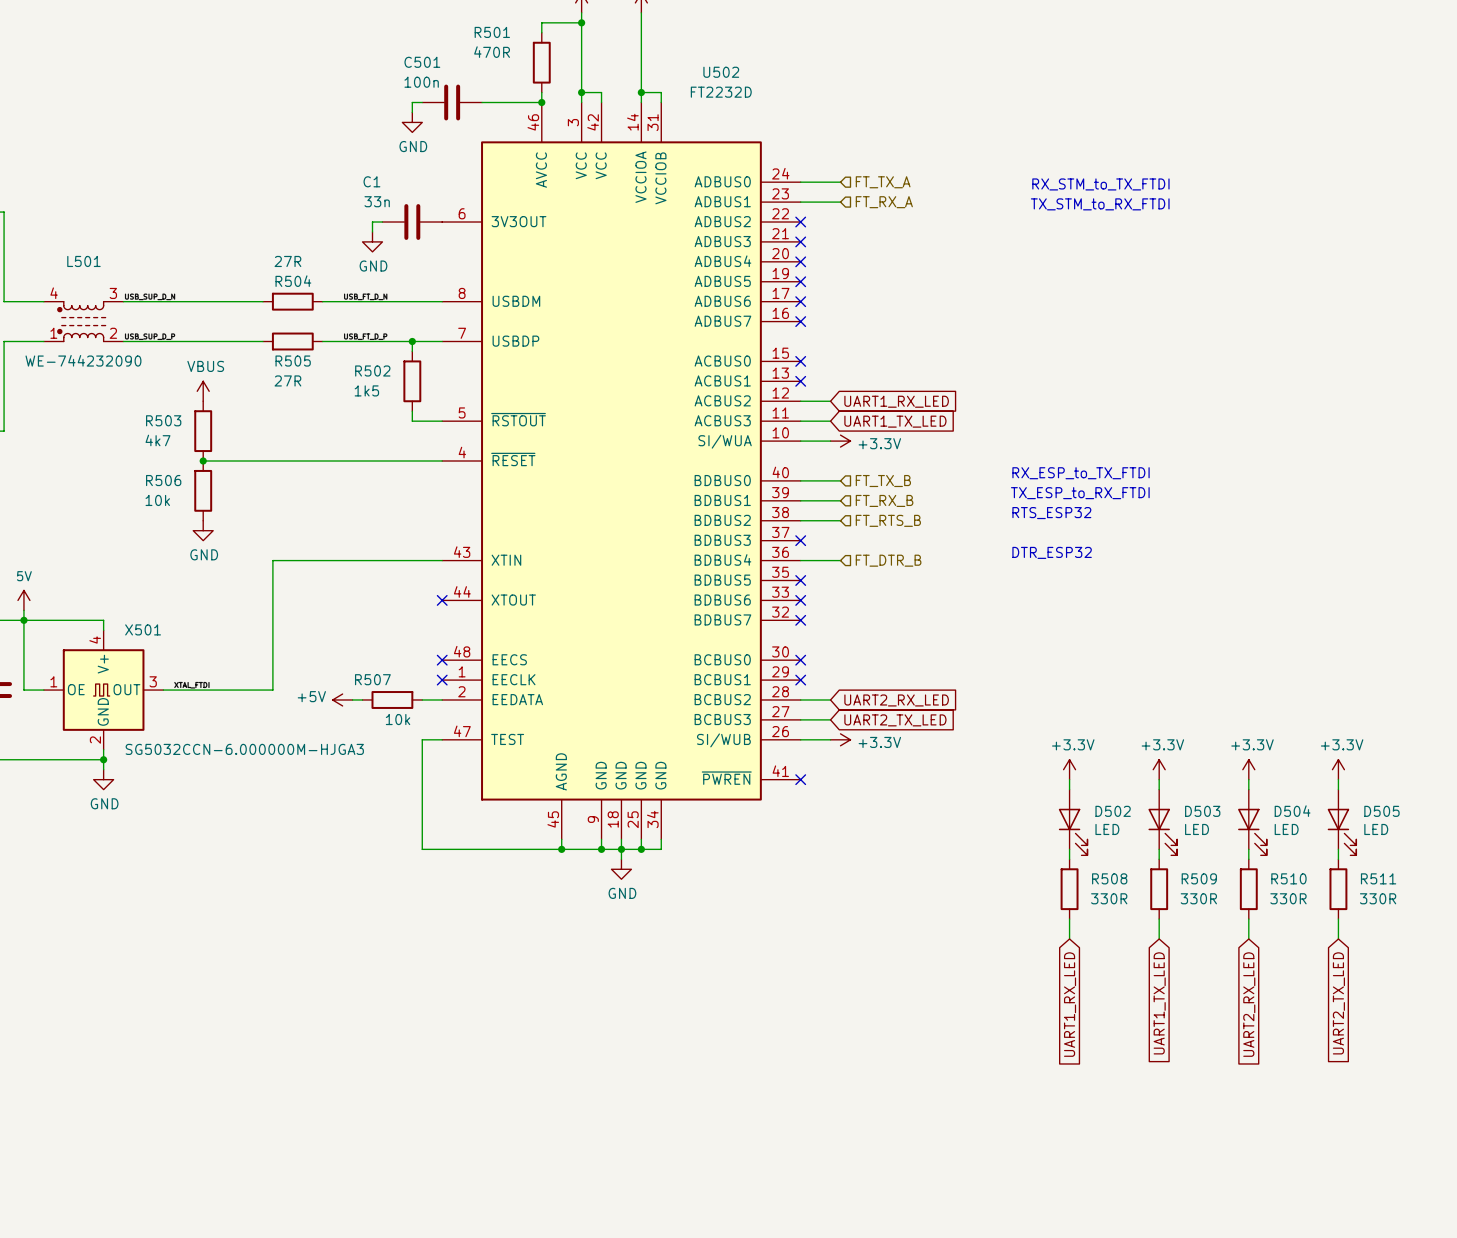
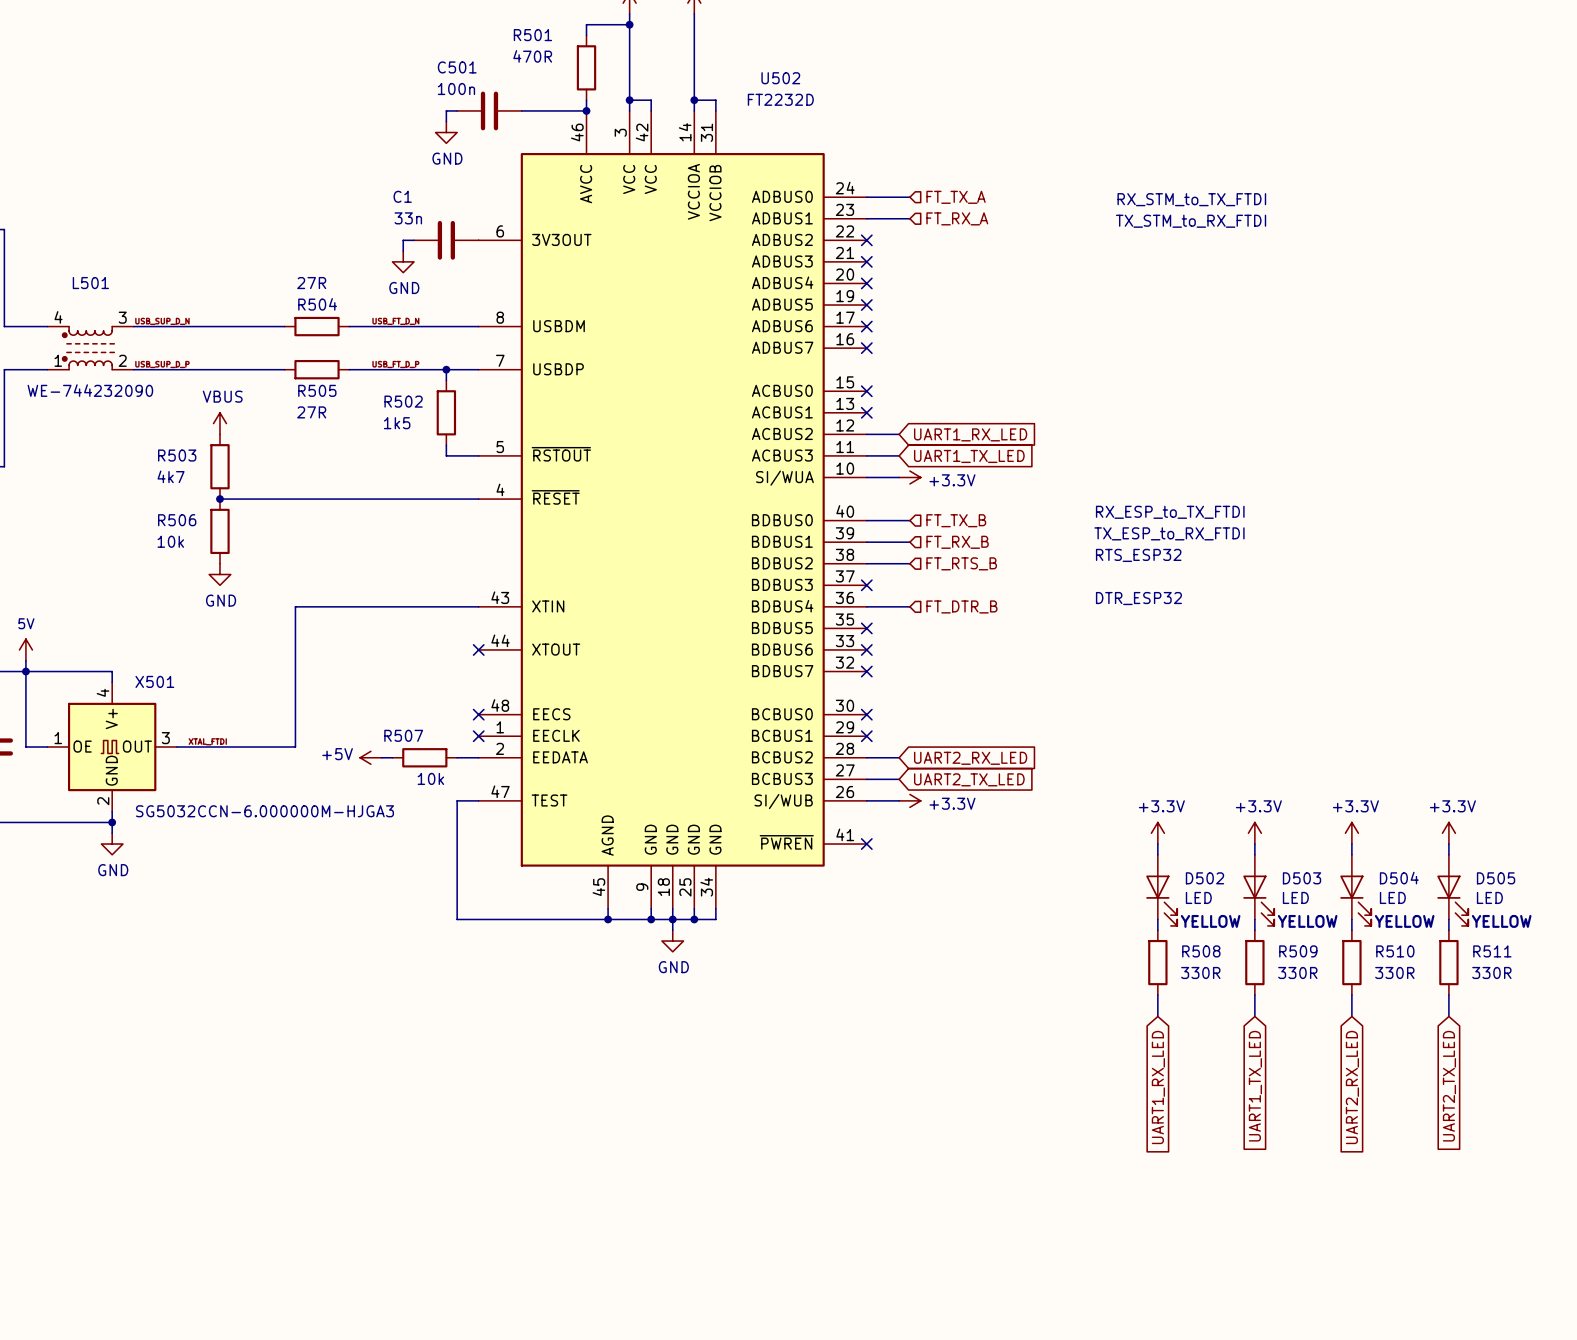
text: none -> YELLOW (1210, 921)
text: none -> YELLOW (1307, 921)
text: none -> YELLOW (1404, 921)
text: none -> YELLOW (1501, 921)

